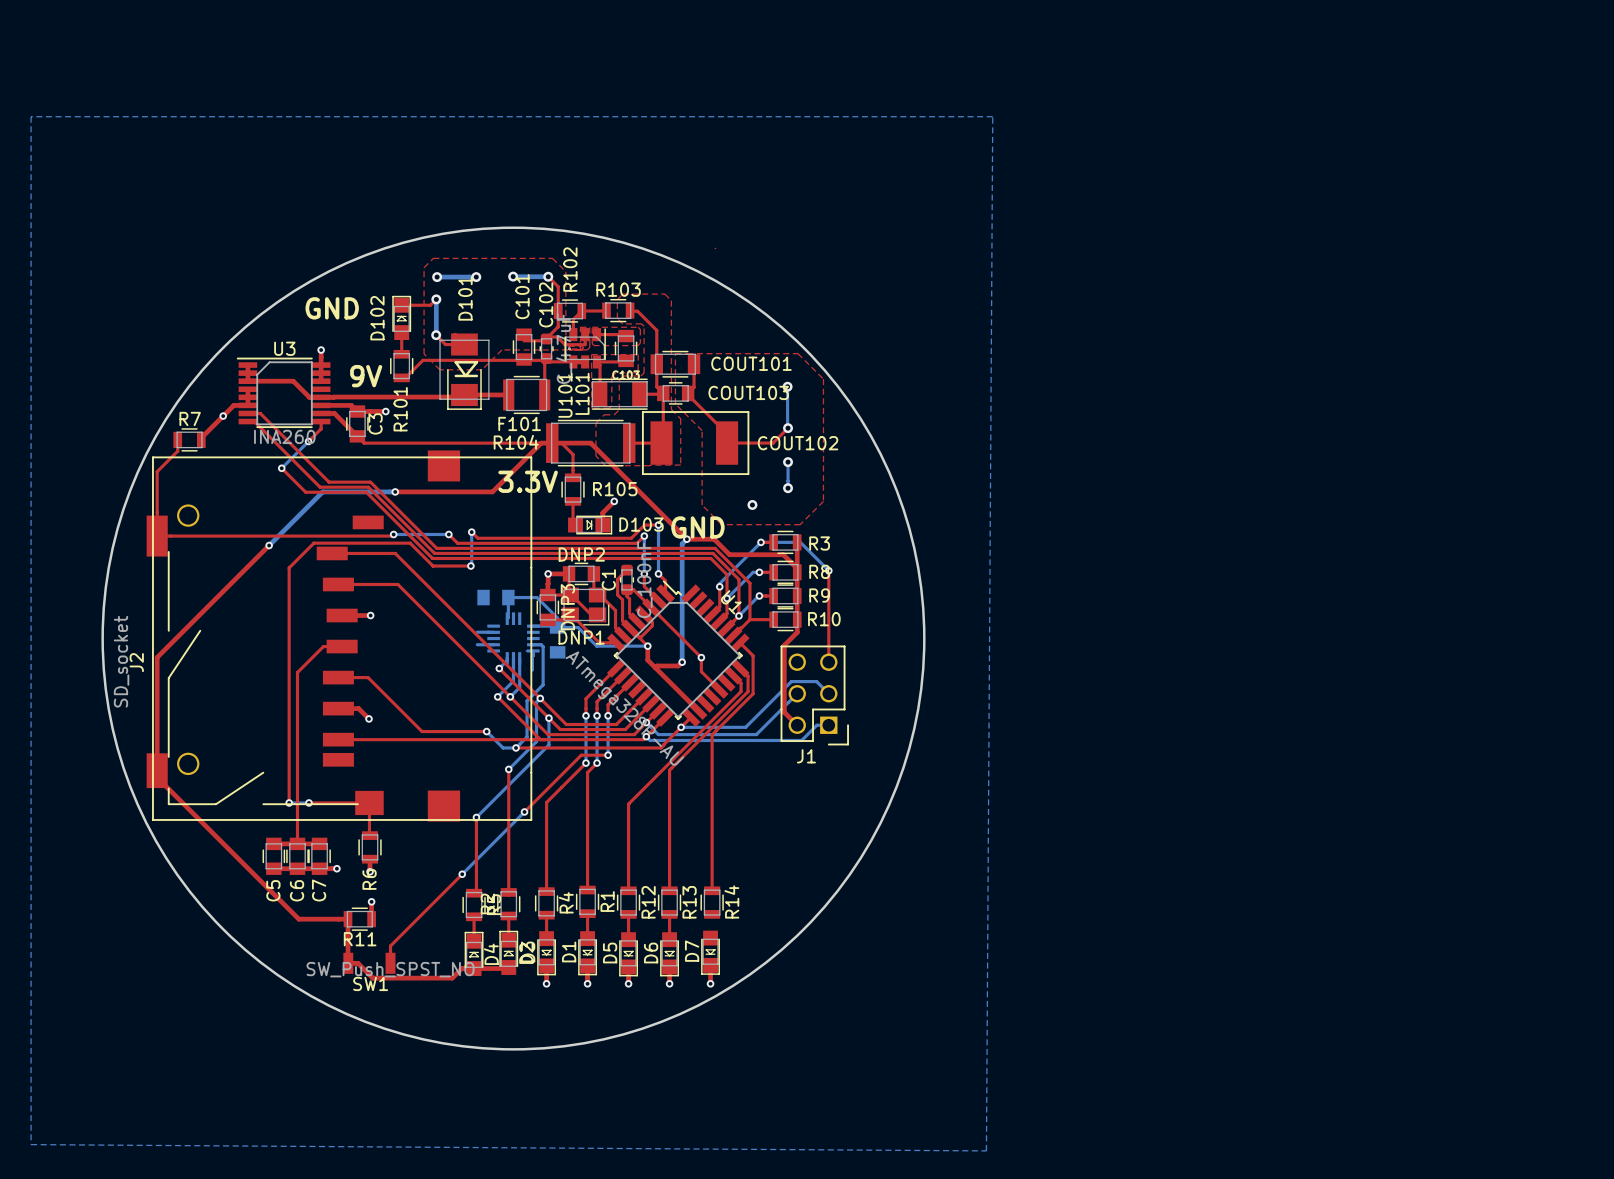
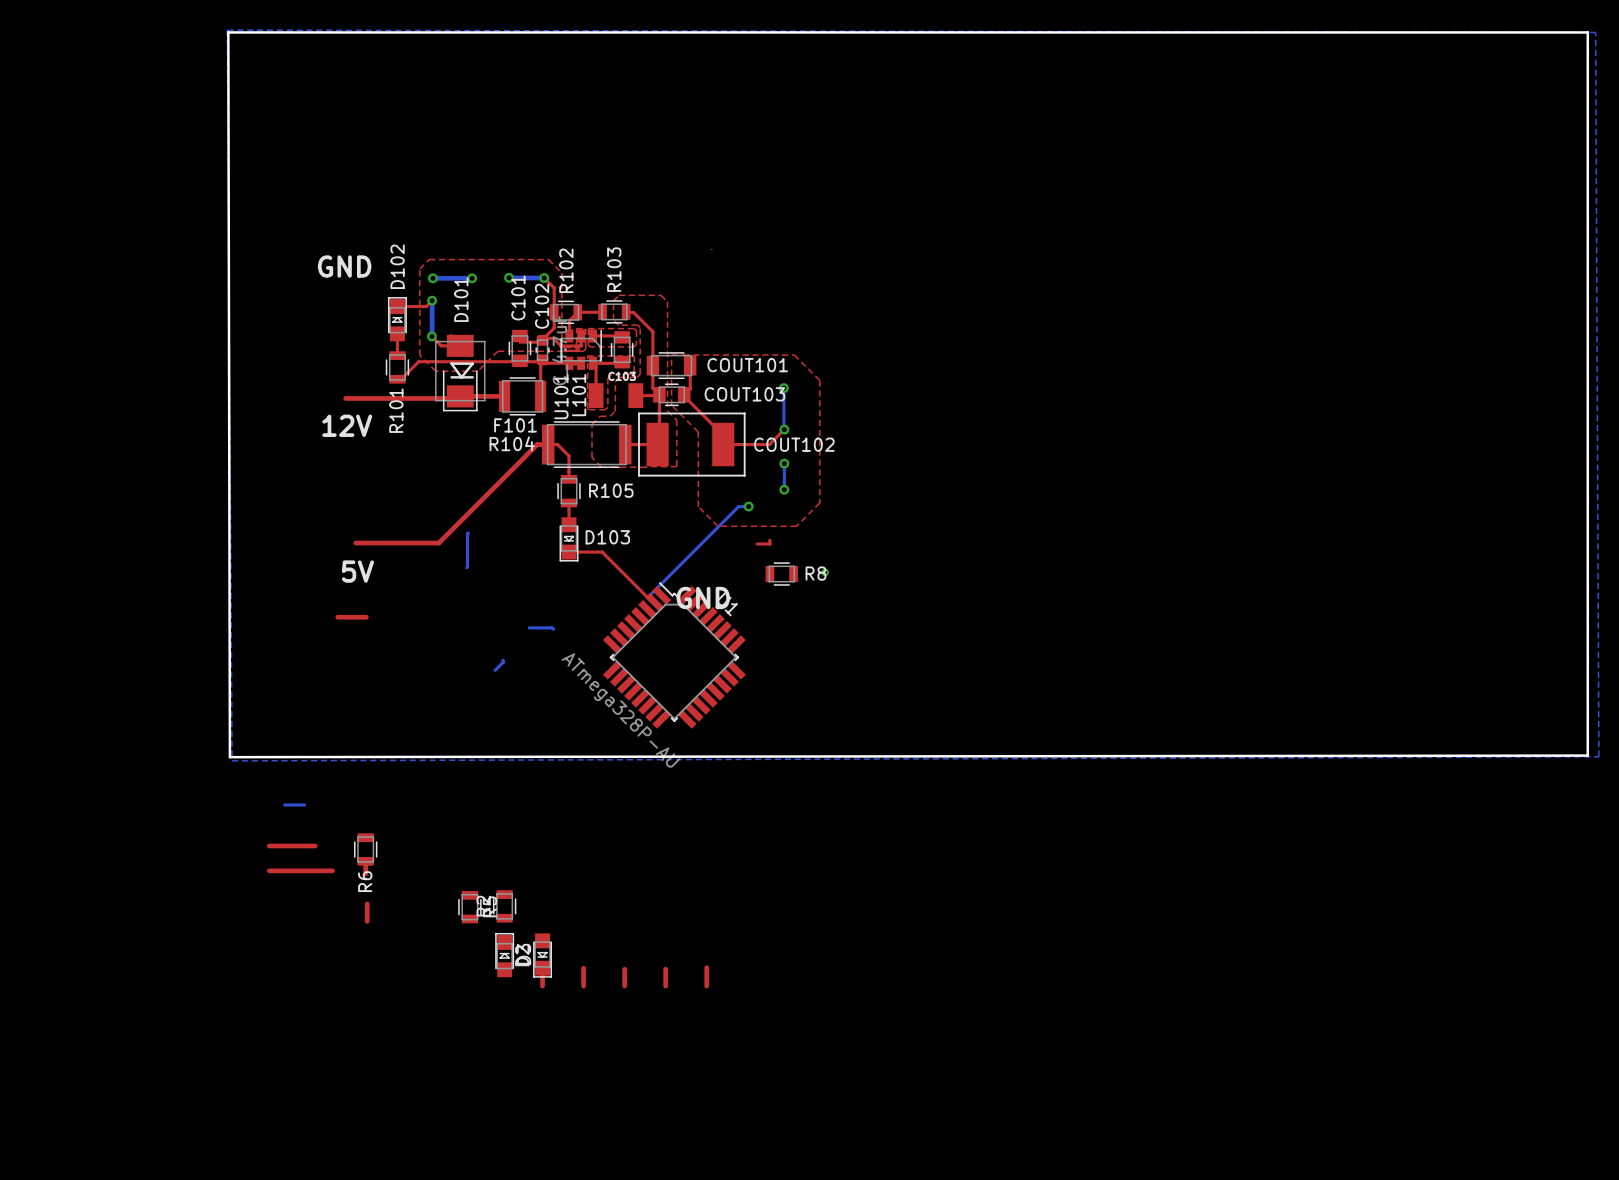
bottom zone outline: none -> (227, 30) (232, 760) (1598, 756) (1595, 32) (227, 30)
board edge: none -> (228, 32) (229, 757) (1587, 755) (1587, 32) (228, 32)
bottom zone outline: (31, 116) (992, 116) (986, 1150) (31, 1144) (31, 116) -> none
round board edge: [101, 226, 926, 1051] -> none
R103 name rotation: 0° (618, 289) -> 90° counterclockwise (614, 269)
text position: GND (332, 308) -> GND (344, 266)
D102 name position: D102 (377, 318) -> D102 (397, 266)
top track: (321, 350) (321, 381) -> none
via: (321, 350) -> none
top track: (247, 365) (247, 381) (293, 381) (309, 397) (350, 397) -> none
text: 9V (366, 376) -> none
L101 footprint: [591, 378, 648, 410] -> [588, 383, 644, 409]
top track: (247, 389) (247, 405) (233, 405) (201, 439) -> none
U3: INA260 (283, 392) -> none
top track: (321, 405) (351, 405) (357, 411) (385, 411) -> none
via: (385, 411) -> none
top track: (247, 413) (260, 413) (329, 482) (370, 482) (436, 548) (715, 548) (749, 583) (749, 619) -> none
top track: (321, 413) (334, 413) (364, 443) (590, 443) (686, 539) (714, 539) (729, 554) (783, 554) (797, 568) -> none
via: (223, 416) -> none
top track: (247, 421) (254, 421) (320, 487) (368, 487) (434, 553) (712, 553) (738, 579) (738, 615) (726, 628) -> none
top track: (321, 421) (321, 428) (308, 441) -> none
C3: (357, 423) -> none
text: none -> 12V (347, 425)
R7: (189, 439) -> none
bottom track: (308, 441) (281, 468) -> none
via: (308, 441) -> none
top track: (177, 443) (177, 439) (177, 451) (157, 471) (157, 536) (392, 536) (393, 534) -> none
top track: (281, 468) (305, 492) (366, 492) (432, 558) (710, 558) (726, 574) (726, 613) (719, 621) -> none
via: (281, 468) -> none
text: 3.3V (528, 481) -> none
top track: (395, 491) (492, 491) -> (355, 543) (438, 543) (488, 493)
bottom track: (395, 491) (322, 491) (269, 545) -> none
via: (395, 491) -> none
top track: (614, 501) (602, 512) (602, 525) -> none
via: (614, 501) -> none
bottom track: none -> (748, 506) (738, 506) (647, 597)
D103 rotation: 0° (590, 525) -> 90° clockwise (569, 539)
top track: (658, 525) (644, 525) (631, 538) (477, 538) (471, 532) -> none
bottom track: (658, 525) (658, 573) -> none
via: (658, 525) -> none
text position: GND (697, 527) -> GND (703, 597)
via: (471, 532) -> none
bottom track: (393, 534) (448, 534) -> none
via: (393, 534) -> none
top track: (448, 534) (457, 543) (637, 543) (644, 536) -> none
via: (448, 534) -> none
bottom track: (644, 536) (644, 573) -> none
via: (644, 536) -> none
top track: (797, 538) (797, 632) (784, 645) (784, 712) (797, 725) -> none
bottom track: (686, 539) (682, 543) (682, 662) -> none
via: (686, 539) -> none
via: (761, 542) -> none
R3: (785, 542) -> none
top track: (269, 545) (157, 657) (157, 777) (298, 919) (348, 919) (348, 963) (358, 963) (372, 978) (452, 978) (461, 968) (508, 967) -> none
via: (269, 545) -> none
top track: none -> (569, 552) (602, 552) (647, 597)
top track: (332, 553) (395, 553) (566, 724) (616, 724) (644, 696) -> none
top track: (433, 566) (410, 543) (313, 543) (289, 567) (289, 802) -> none
top track: (433, 566) (470, 566) -> none
via: (470, 566) -> none
text: none -> 5V (357, 571)
top track: (626, 570) (617, 579) (617, 594) (622, 599) (622, 620) (647, 646) (647, 660) (655, 667) -> none
top track: (828, 570) (828, 662) -> none
bottom track: (828, 570) (800, 542) (761, 542) (719, 583) (719, 586) -> none
top track: (759, 572) (773, 572) -> none
bottom track: (759, 572) (753, 572) (726, 598) -> none
via: (759, 572) -> none
via: (548, 573) -> none
DNP2: (581, 573) -> none
top track: (593, 573) (593, 591) (615, 610) (615, 627) (623, 635) -> none
top track: (644, 573) (644, 586) (658, 600) -> none
via: (644, 573) -> none
top track: (658, 573) (665, 580) (665, 593) -> none
via: (658, 573) -> none
C1: C_100nF (626, 579) -> none
top track: (338, 584) (397, 584) (548, 734) (634, 734) (658, 710) -> none
top track: (719, 586) (719, 607) (712, 614) -> none
via: (719, 586) -> none
top track: (570, 595) (569, 593) (569, 573) (548, 573) (547, 595) (571, 595) (591, 614) (597, 614) -> none
top track: (759, 595) (773, 595) -> none
bottom track: (759, 595) (738, 615) -> none
via: (759, 595) -> none
R9: (785, 595) -> none
part: (495, 597) -> none
via: (726, 598) -> none
DNP1: (585, 606) -> none
DNP3: (547, 607) -> none
top track: (644, 614) (652, 622) (652, 625) (641, 636) (638, 636) -> none
via: (370, 615) -> none
via: (738, 615) -> none
bottom track: (507, 618) (508, 597) (537, 597) (557, 618) (557, 627) (578, 627) (596, 646) (647, 646) -> none
top track: (547, 619) (565, 619) (571, 614) (599, 642) (616, 642) -> none
top track: (749, 619) (733, 635) -> none
top track: (749, 619) (773, 619) -> none
R10: (785, 619) -> none
top track: (637, 621) (629, 613) (629, 598) (626, 596) (626, 589) (633, 589) (701, 657) (701, 671) (719, 689) -> none
bottom track: (477, 632) (488, 632) -> none
J2: SD_socket (339, 636) -> none
part: (513, 638) -> none
part: (557, 639) -> none
top track: (740, 642) (753, 655) (753, 693) (712, 734) (712, 890) -> none
bottom track: (477, 644) (493, 644) -> none
bottom track: (533, 644) (543, 646) (543, 684) (527, 700) (527, 736) (516, 747) (503, 747) (486, 731) -> none
top track: (333, 646) (342, 646) (323, 646) (297, 672) (297, 843) -> none
via: (647, 646) -> none
bottom track: (526, 650) (533, 650) (532, 670) -> none
via: (701, 657) -> none
bottom track: (513, 658) (513, 681) (497, 696) -> none
bottom track: (519, 658) (519, 687) (510, 696) -> none
top track: (682, 662) (678, 665) (657, 665) (655, 667) -> none
via: (682, 662) -> none
top track: (655, 667) (698, 710) -> none
top track: (499, 668) (560, 729) (625, 729) (651, 703) -> none
via: (499, 668) -> none
top track: (616, 668) (586, 698) (586, 715) -> none
top track: (740, 668) (748, 676) (748, 691) (669, 770) (669, 890) -> none
top track: (623, 675) (597, 701) (597, 715) -> none
top track: (733, 675) (741, 683) (741, 691) (628, 804) (628, 890) -> none
top track: (338, 677) (368, 677) (422, 731) (486, 731) -> none
top track: (630, 682) (608, 704) (608, 715) -> none
bottom track: (797, 693) (756, 734) (658, 734) (646, 722) -> none
bottom track: (828, 693) (816, 681) (791, 681) (745, 727) (681, 727) -> none
J1: (814, 695) -> none
top track: (497, 696) (540, 739) -> none
via: (497, 696) -> none
via: (510, 696) -> none
bottom track: (540, 698) (536, 702) (536, 741) (508, 769) -> none
via: (540, 698) -> none
top track: (338, 708) (358, 708) (369, 718) -> none
bottom track: (586, 715) (586, 763) -> none
via: (586, 715) -> none
bottom track: (597, 715) (597, 763) -> none
via: (597, 715) -> none
bottom track: (608, 715) (608, 755) -> none
via: (608, 715) -> none
top track: (665, 717) (643, 739) (338, 739) -> none
top track: (691, 717) (661, 747) (516, 747) -> none
via: (369, 718) -> none
bottom track: (548, 718) (548, 744) (474, 819) -> none
via: (548, 718) -> none
via: (646, 722) -> none
bottom track: (828, 725) (816, 725) (801, 740) (650, 740) (646, 736) -> none
via: (681, 727) -> none
via: (486, 731) -> none
via: (646, 736) -> none
via: (516, 747) -> none
top track: (608, 755) (581, 755) (524, 811) -> none
via: (608, 755) -> none
top track: (586, 763) (546, 802) (546, 891) -> none
via: (586, 763) -> none
top track: (597, 763) (587, 772) (587, 890) -> none
via: (597, 763) -> none
top track: (508, 769) (508, 895) -> none
via: (508, 769) -> none
via: (289, 802) -> none
top track: (308, 802) (369, 802) (370, 835) -> none
via: (308, 802) -> none
bottom track: (524, 811) (462, 874) -> none
via: (524, 811) -> none
top track: (476, 817) (476, 890) (474, 893) -> none
via: (476, 817) -> none
C5: (273, 856) -> none
C6: (297, 856) -> none
C7: (319, 856) -> none
via: (336, 868) -> none
via: (370, 871) -> none
top track: (462, 874) (390, 945) (390, 963) -> none
via: (462, 874) -> none
via: (371, 901) -> none
R1: (587, 901) -> none
R12: (628, 902) -> none
R13: (669, 902) -> none
R14: (712, 902) -> none
R4: (546, 903) -> none
top track: (587, 913) (587, 938) -> none
top track: (628, 914) (628, 939) -> none
top track: (669, 914) (669, 939) -> none
top track: (546, 915) (546, 938) -> none
top track: (474, 916) (474, 941) -> none
top track: (508, 916) (508, 940) -> none
R11: (359, 919) -> none
D7: (710, 952) -> none
D4: (474, 953) -> none
D1: (587, 953) -> none
D5: (628, 954) -> none
D6: (669, 954) -> none
SW1: SW_Push_SPST_NO (369, 963) -> none
via: (546, 983) -> none
via: (587, 983) -> none
via: (628, 983) -> none
via: (669, 983) -> none
via: (710, 983) -> none

